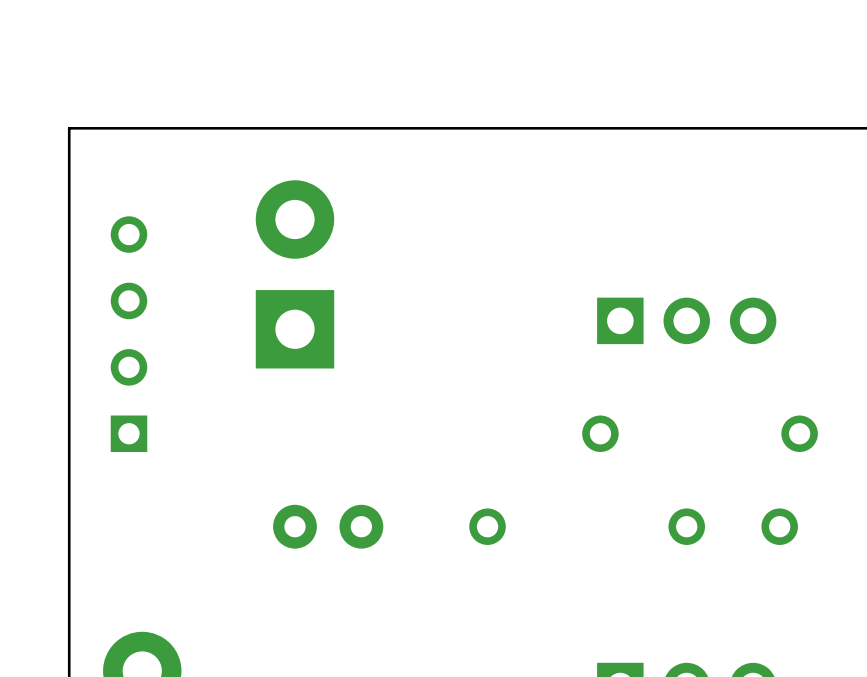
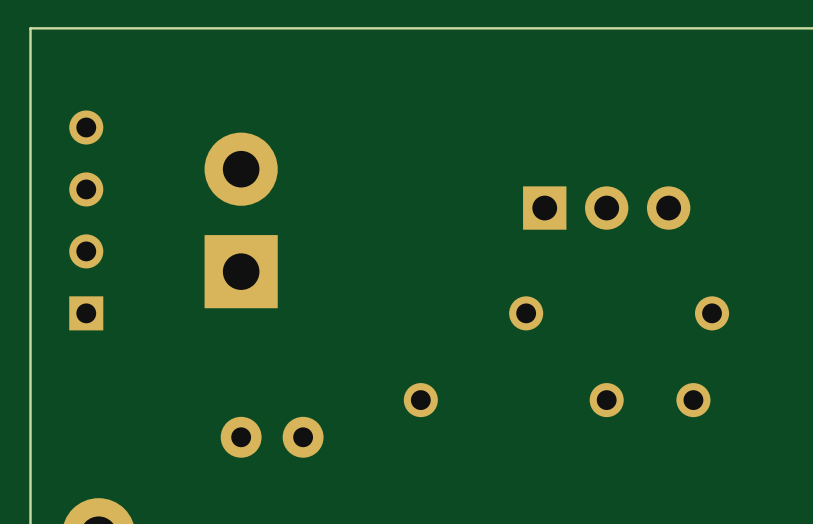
part position: (294, 274) -> (241, 220)
part position: (328, 526) -> (272, 437)

